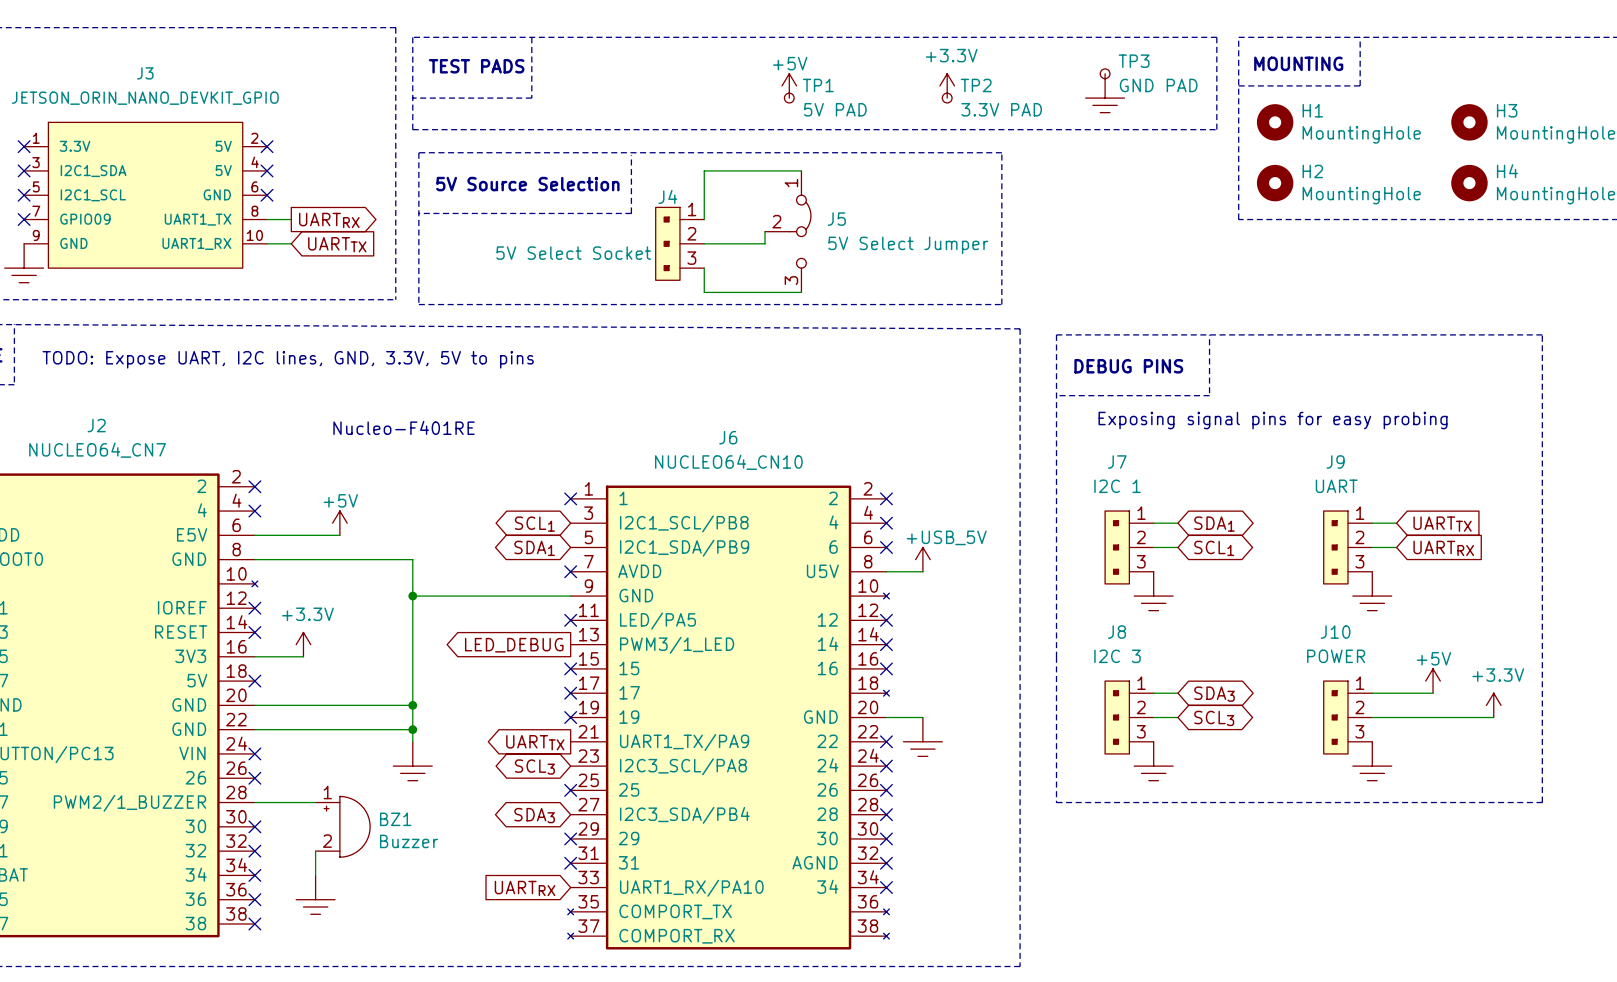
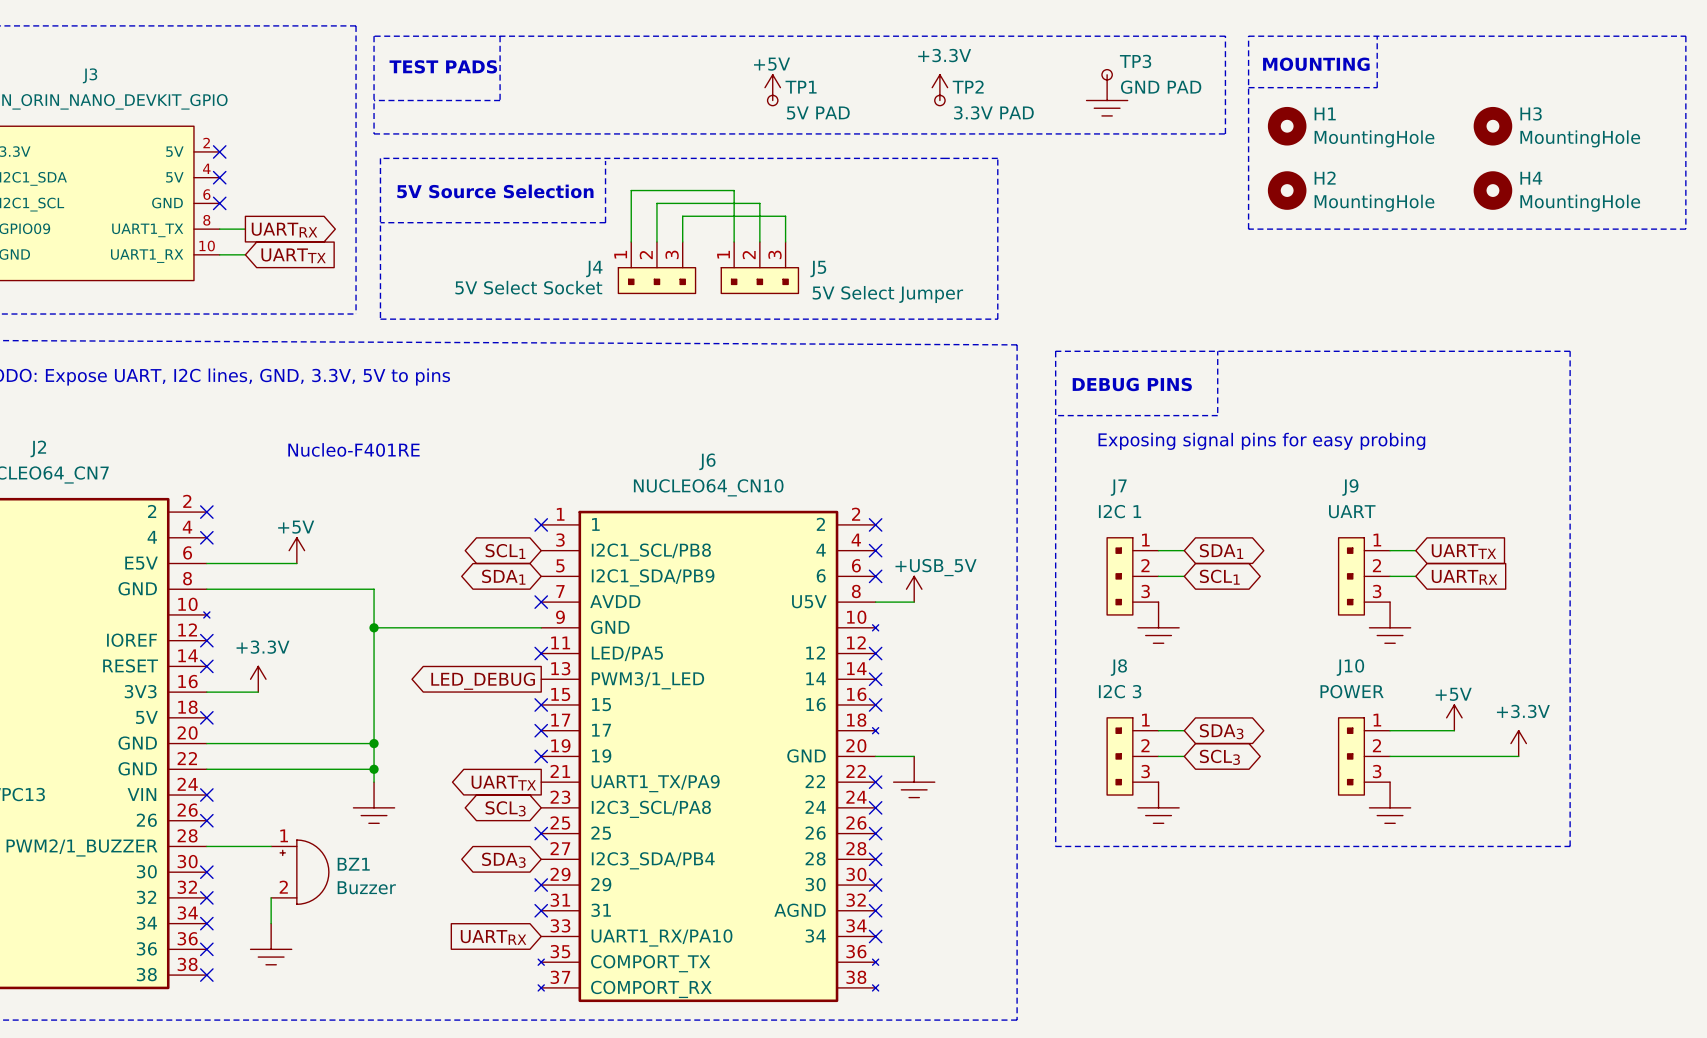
J5 symbol: [765, 170, 811, 293] -> [721, 241, 799, 294]
wire: (801, 170) (704, 170) (704, 207) -> (785, 241) (785, 216) (682, 216)
wire: none -> (682, 229) (682, 241)
wire: none -> (631, 241) (631, 190) (734, 190) (734, 241)
wire: none -> (656, 241) (656, 203) (759, 203) (759, 241)
wire: (765, 231) (765, 243) (704, 243) -> none
J4 rotation: 0° (667, 243) -> 90° counterclockwise (656, 280)
wire: (704, 268) (704, 292) (801, 292) -> none

